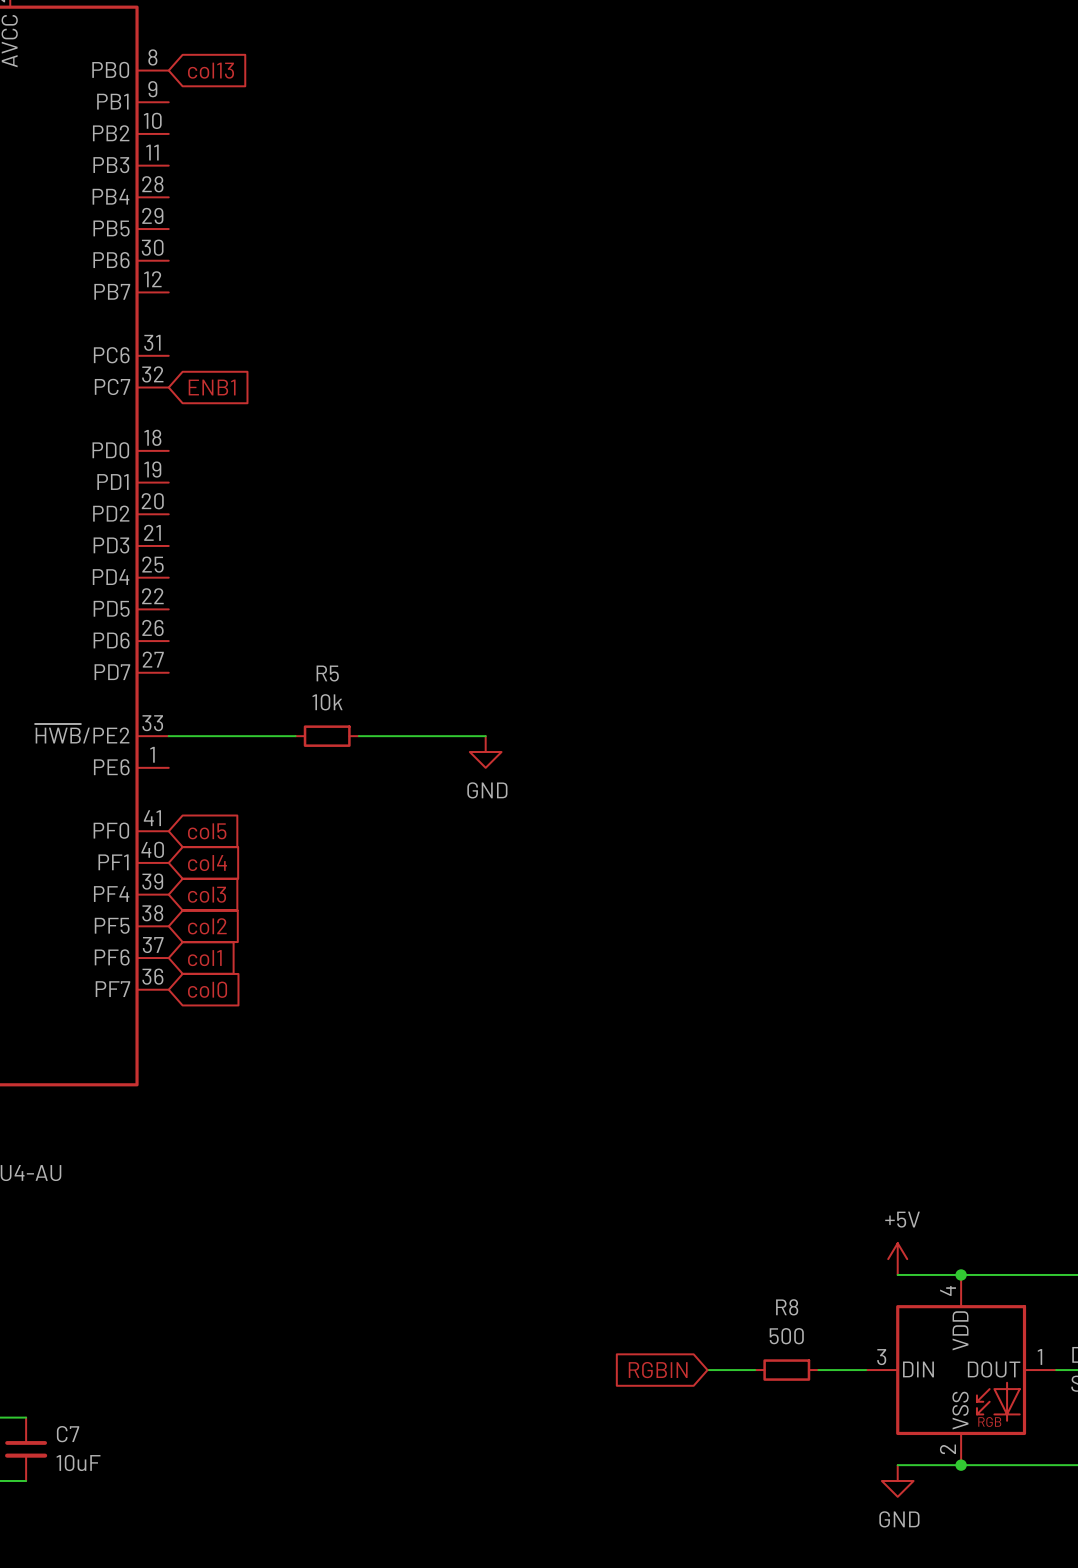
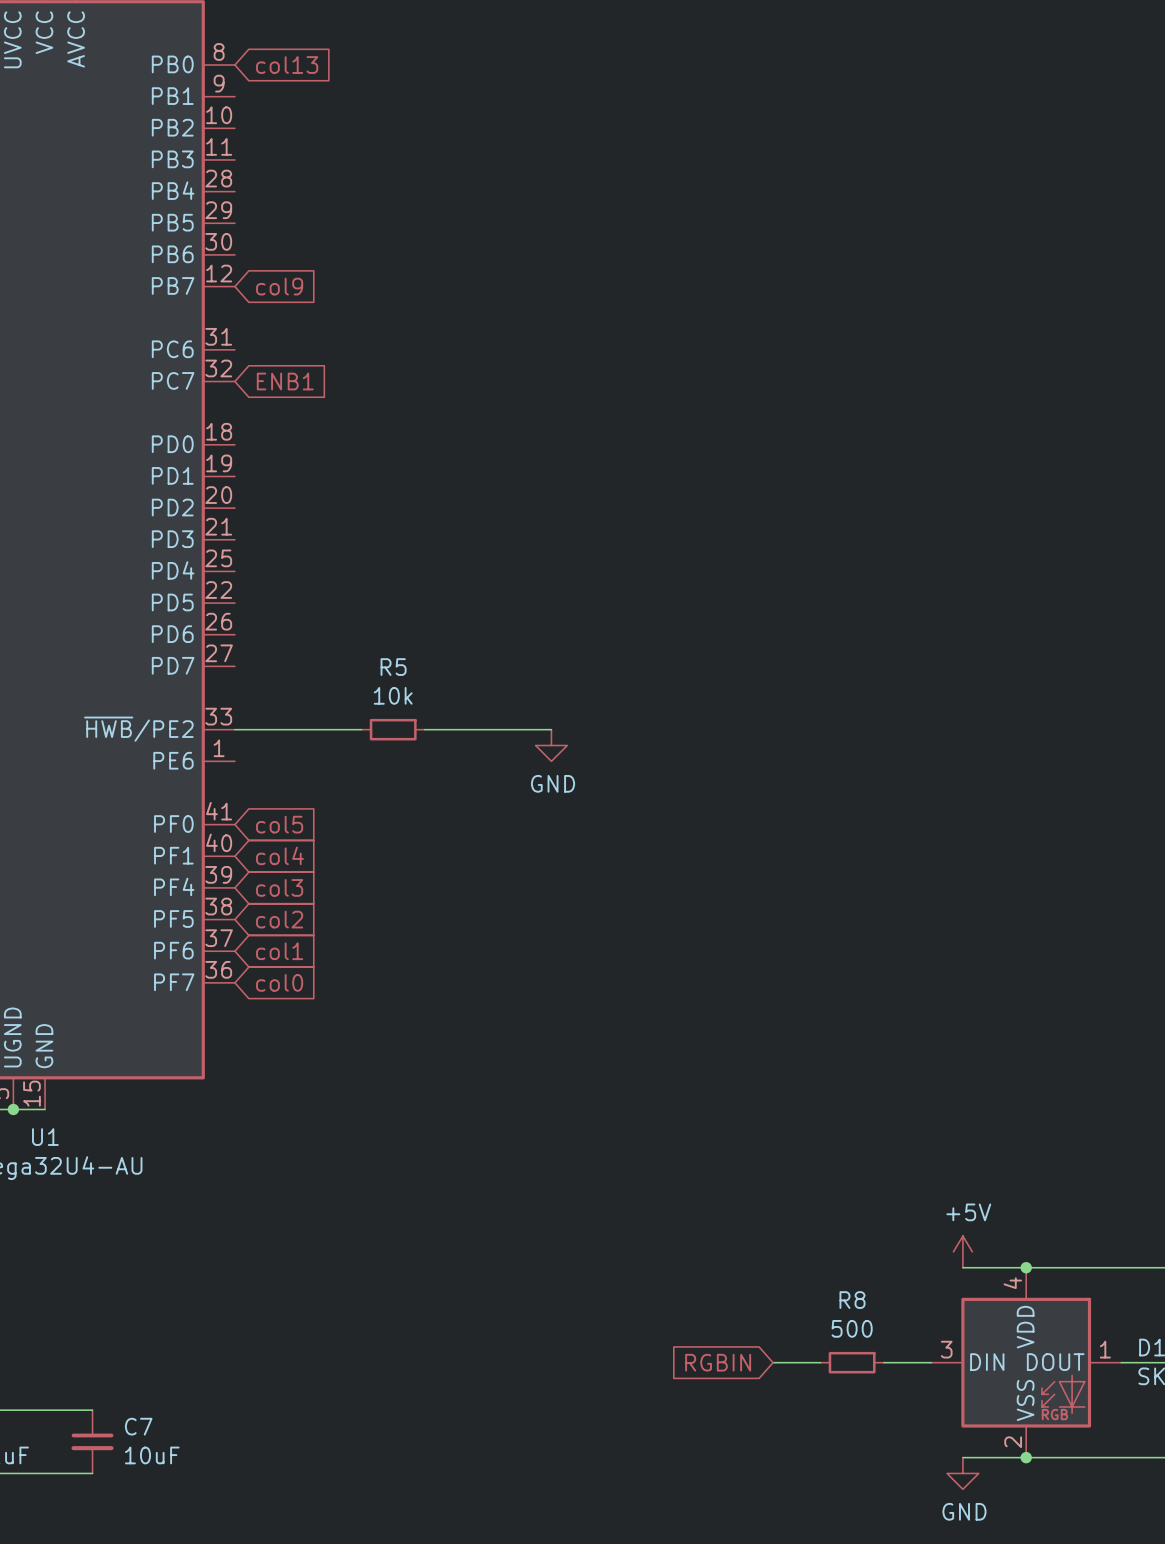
global label: none -> col9 (279, 286)

